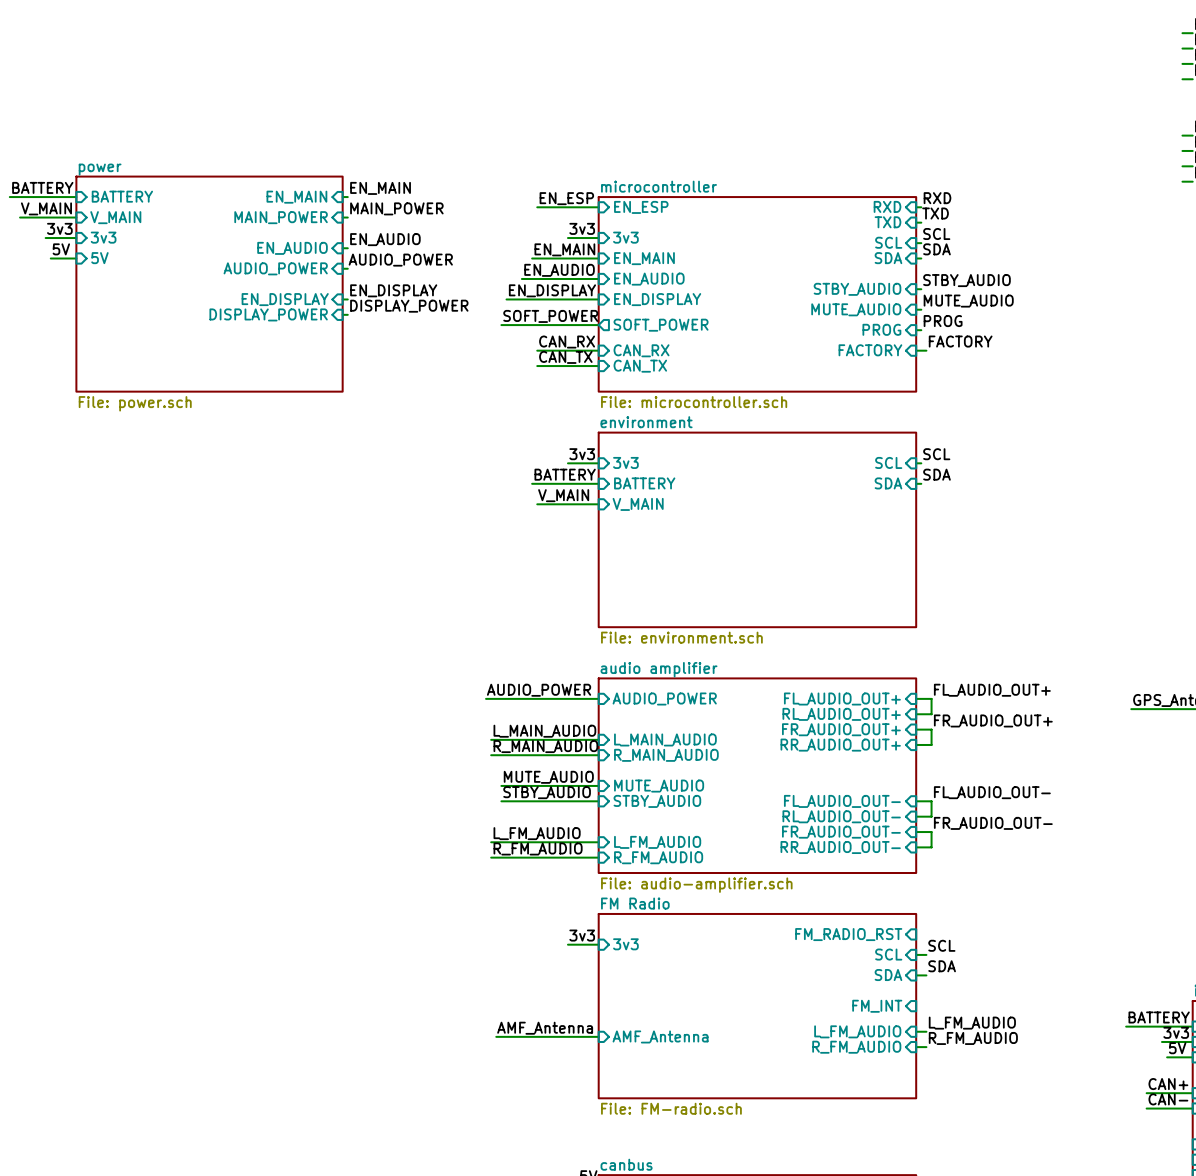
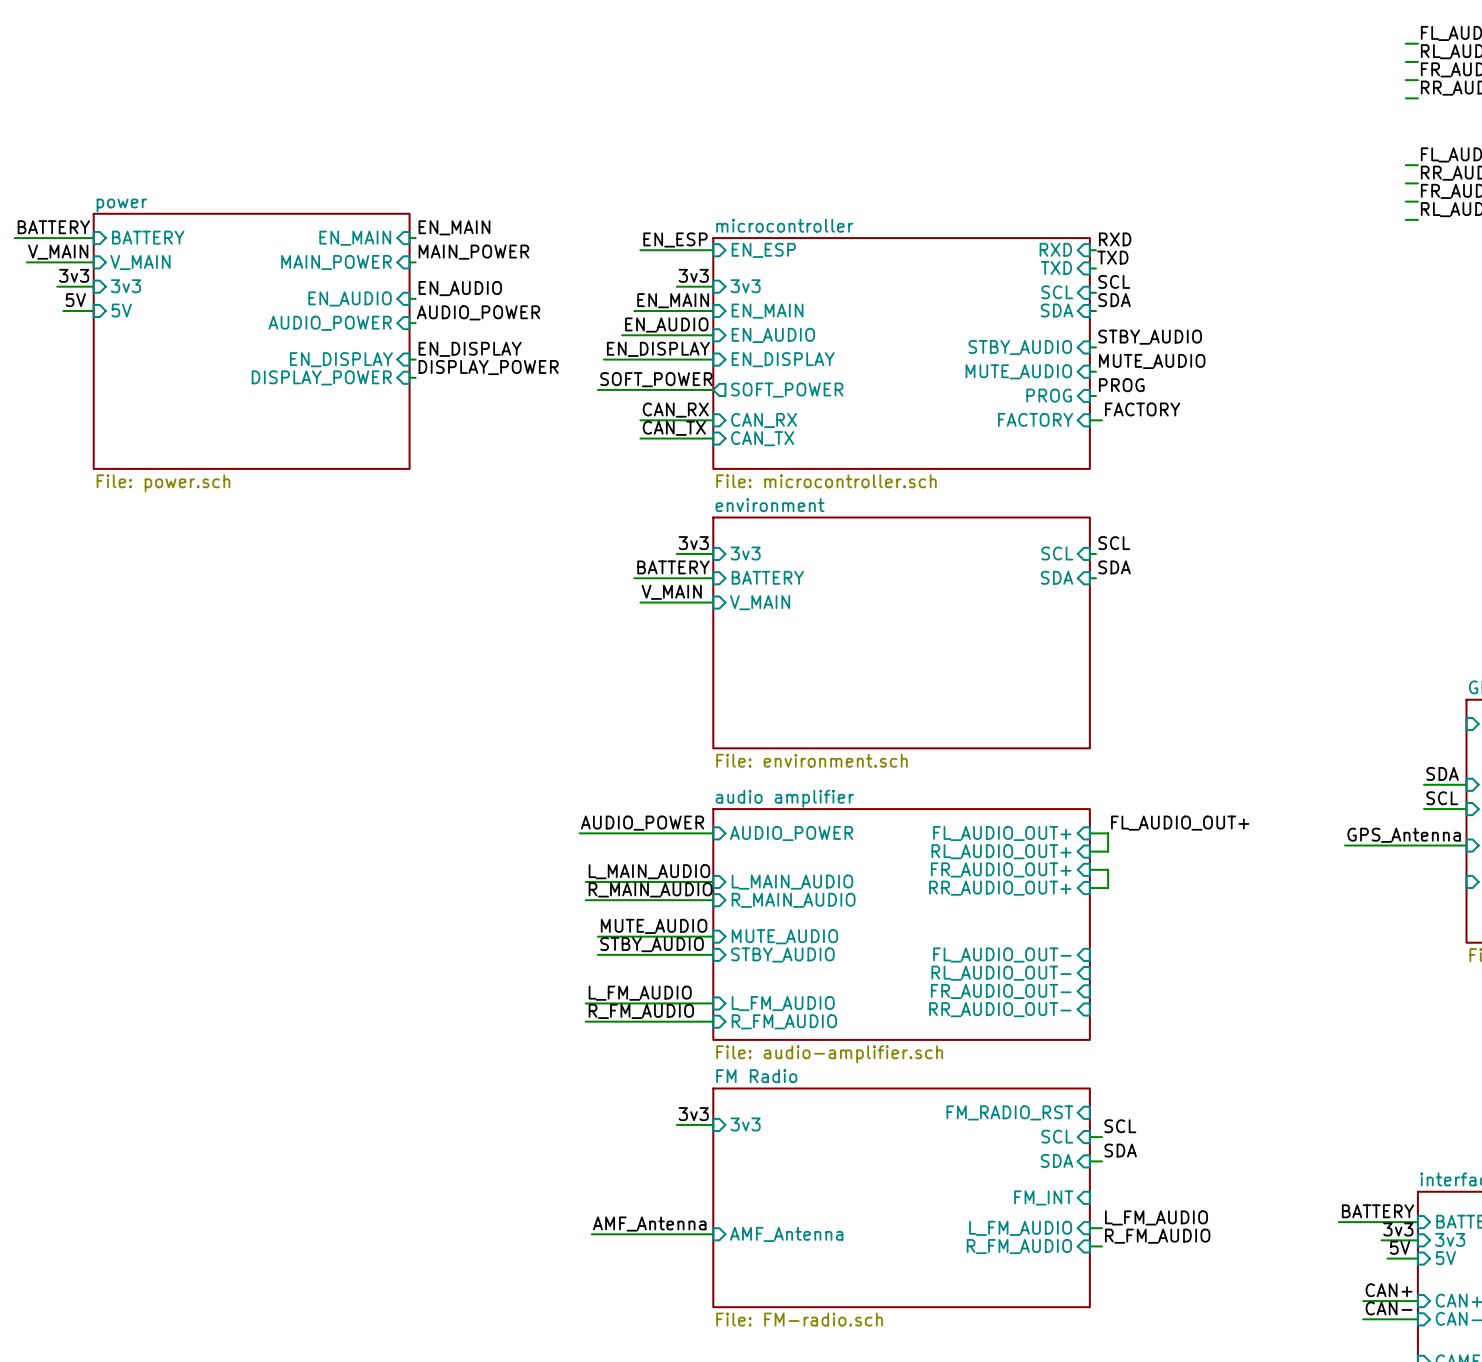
label: FR_AUDIO_OUT+ (993, 720) -> none
label: FL_AUDIO_OUT- (992, 792) -> none
wire: (916, 801) (931, 801) (931, 816) (916, 816) -> none
label: FR_AUDIO_OUT- (993, 823) -> none
wire: (916, 832) (931, 832) (931, 847) (916, 847) -> none

